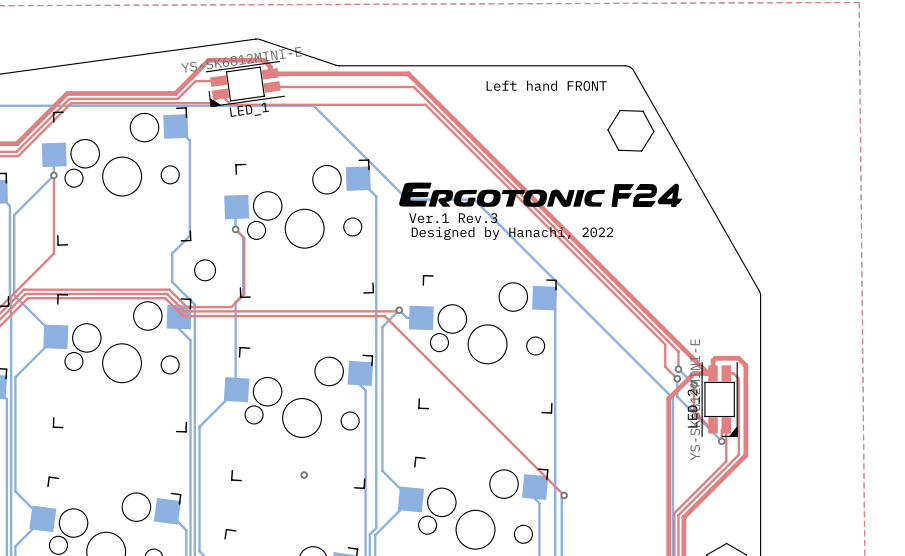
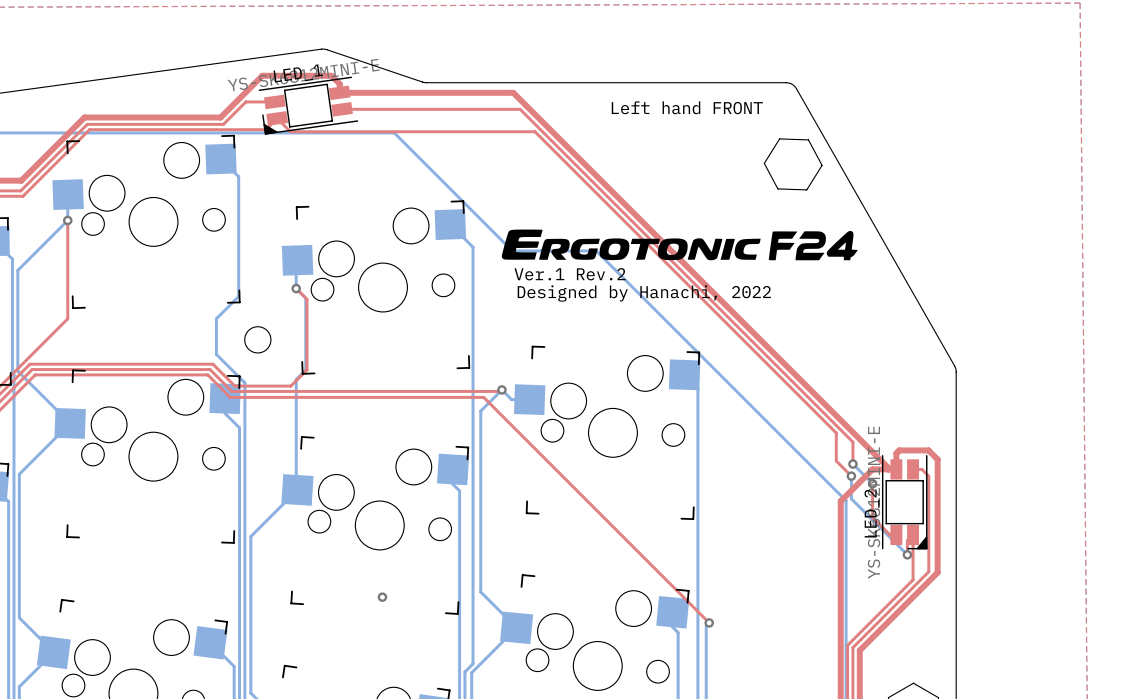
LED_1 name position: LED_1 (249, 109) -> LED_1 (298, 73)
text: Ver.1 Rev.3 (453, 218) -> Ver.1 Rev.2 (570, 274)

